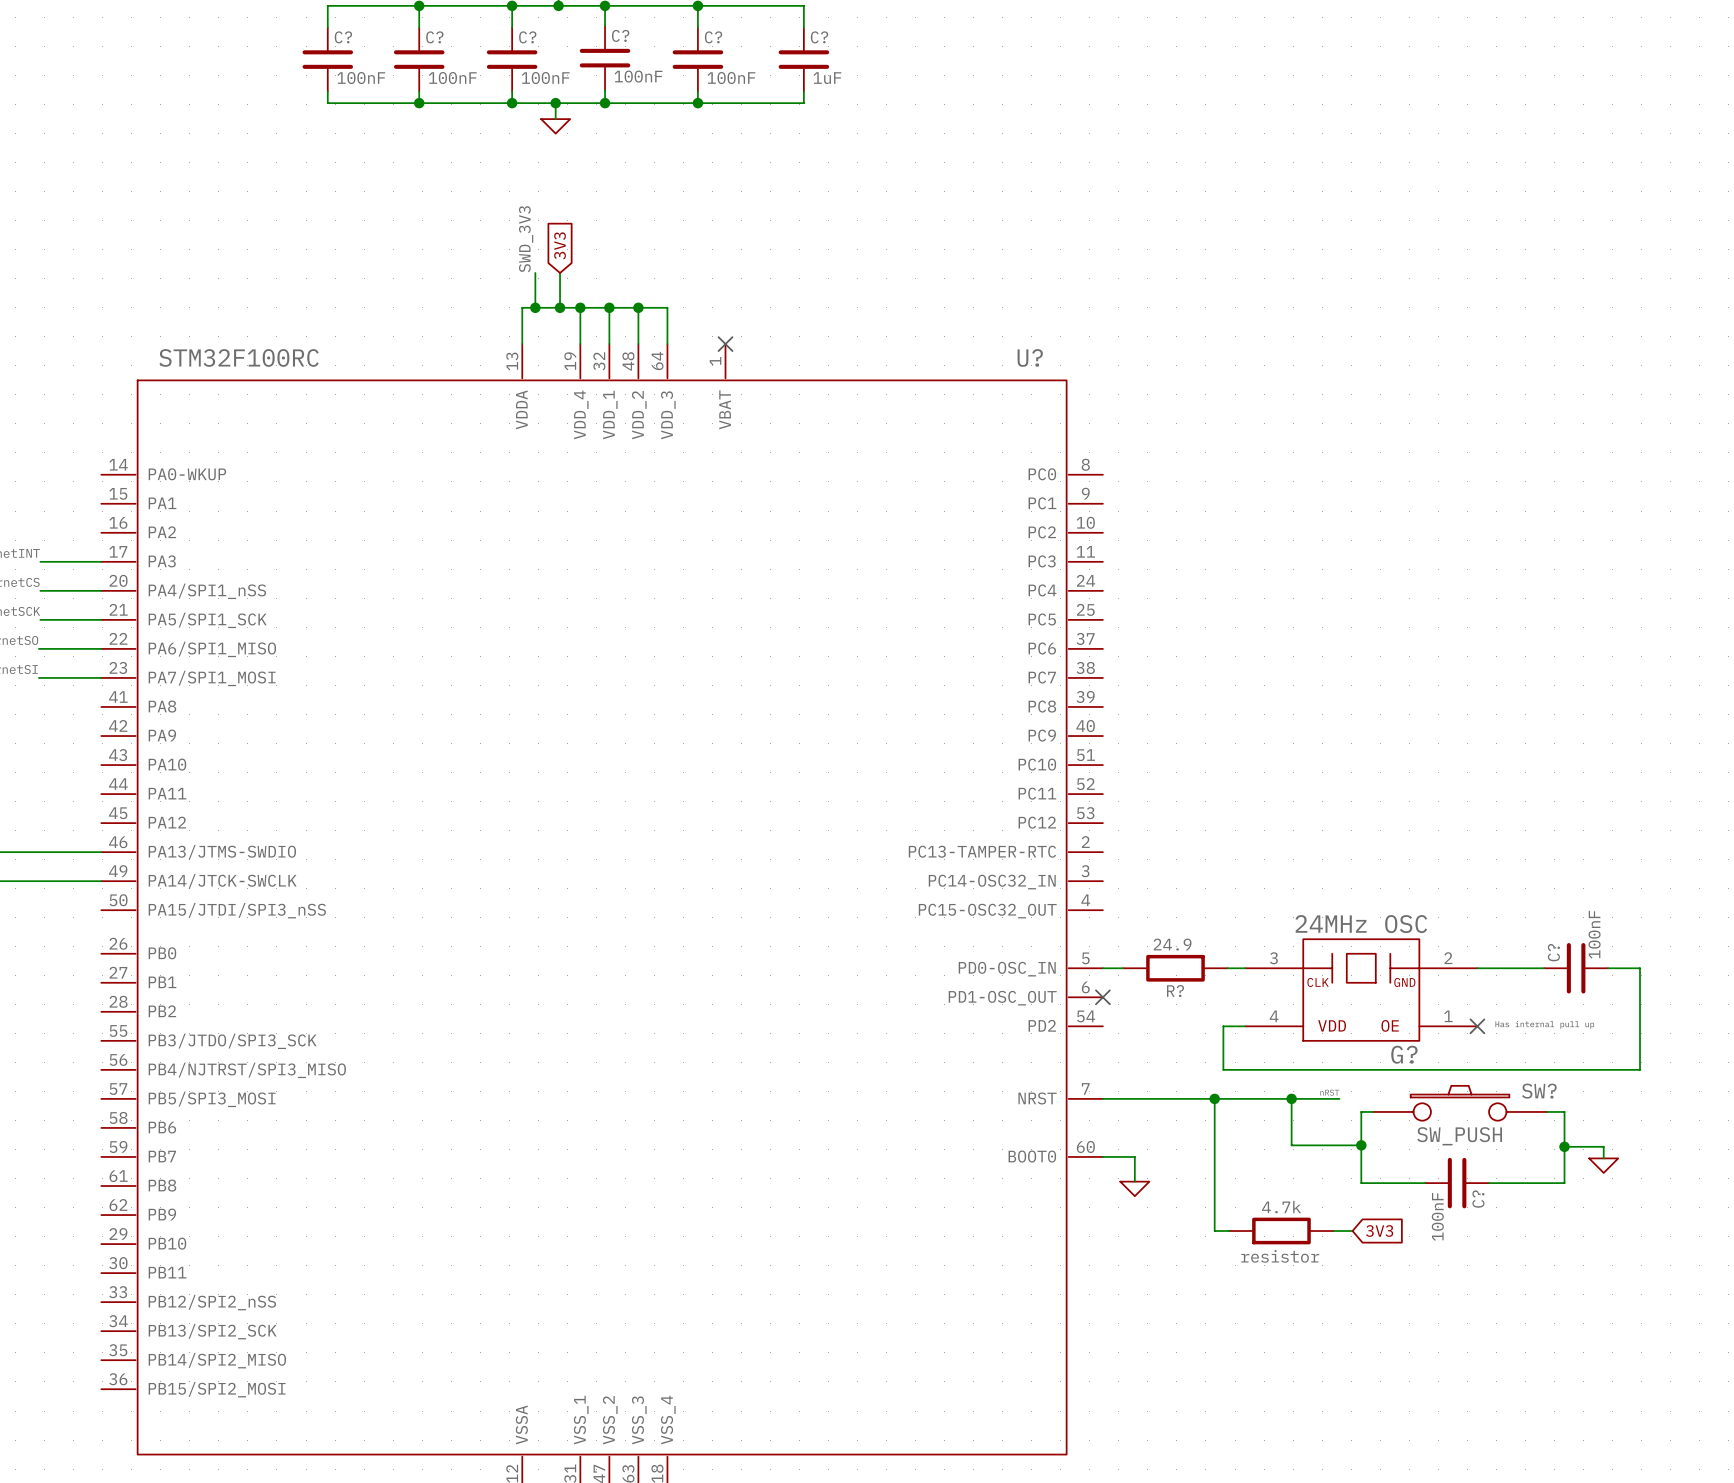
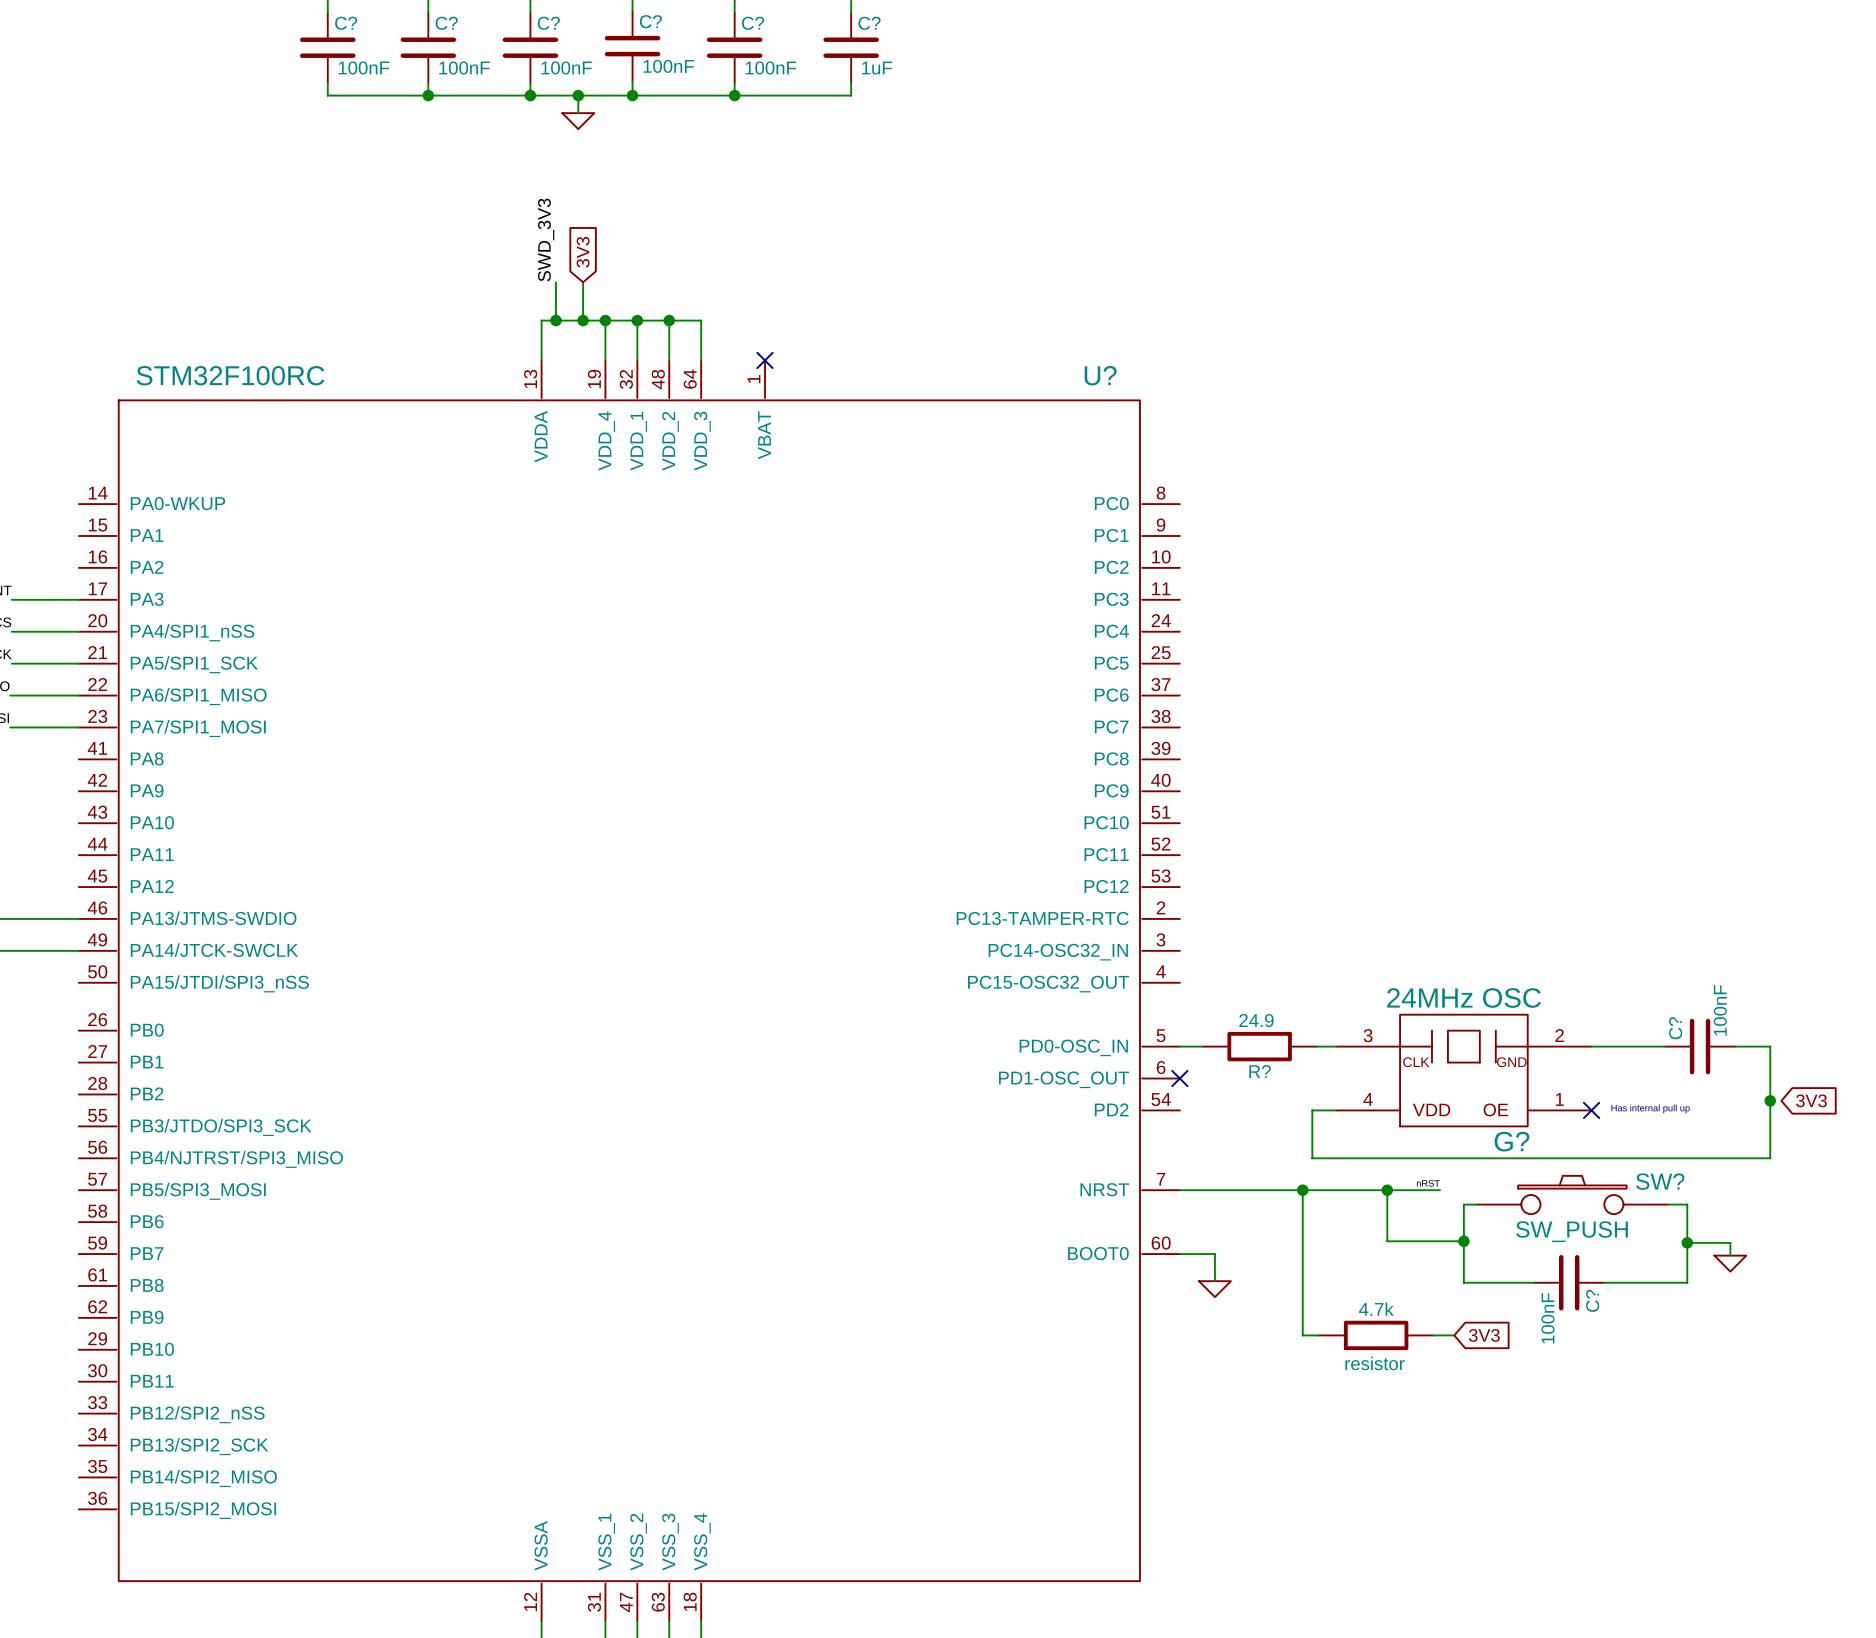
junction: none -> (1770, 1100)
global label: none -> 3V3 (1811, 1100)

